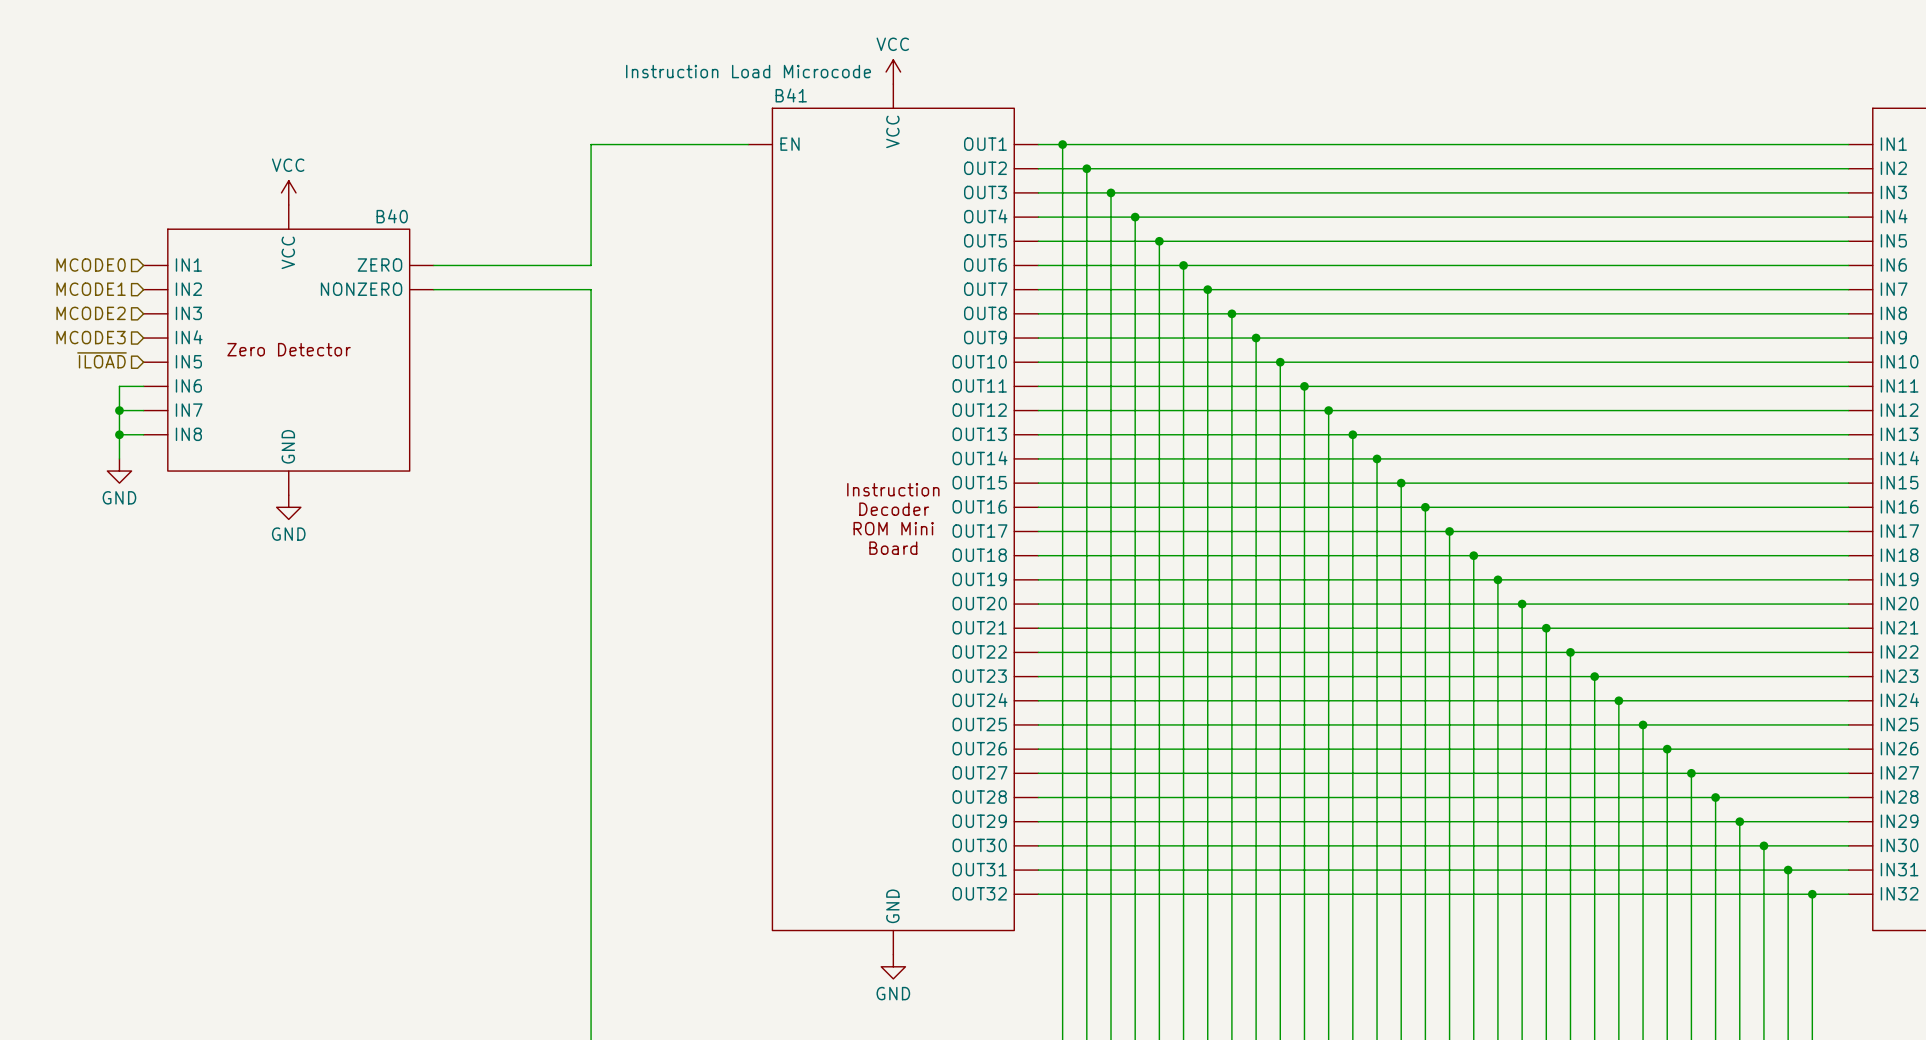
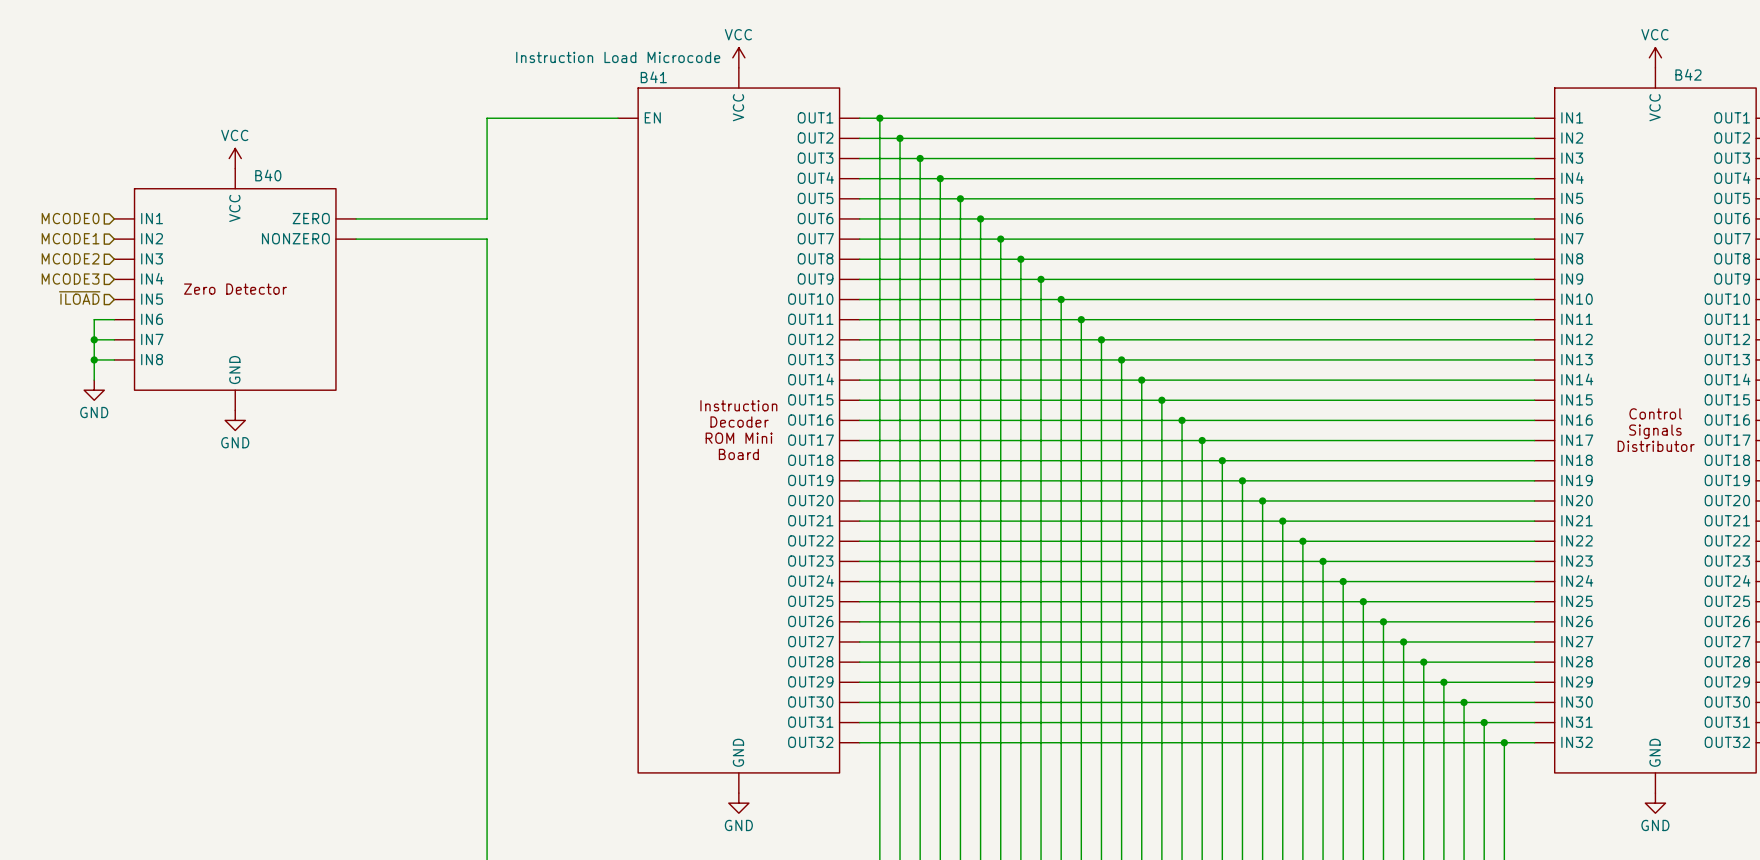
B40 name position: B40 (392, 216) -> B40 (268, 175)

